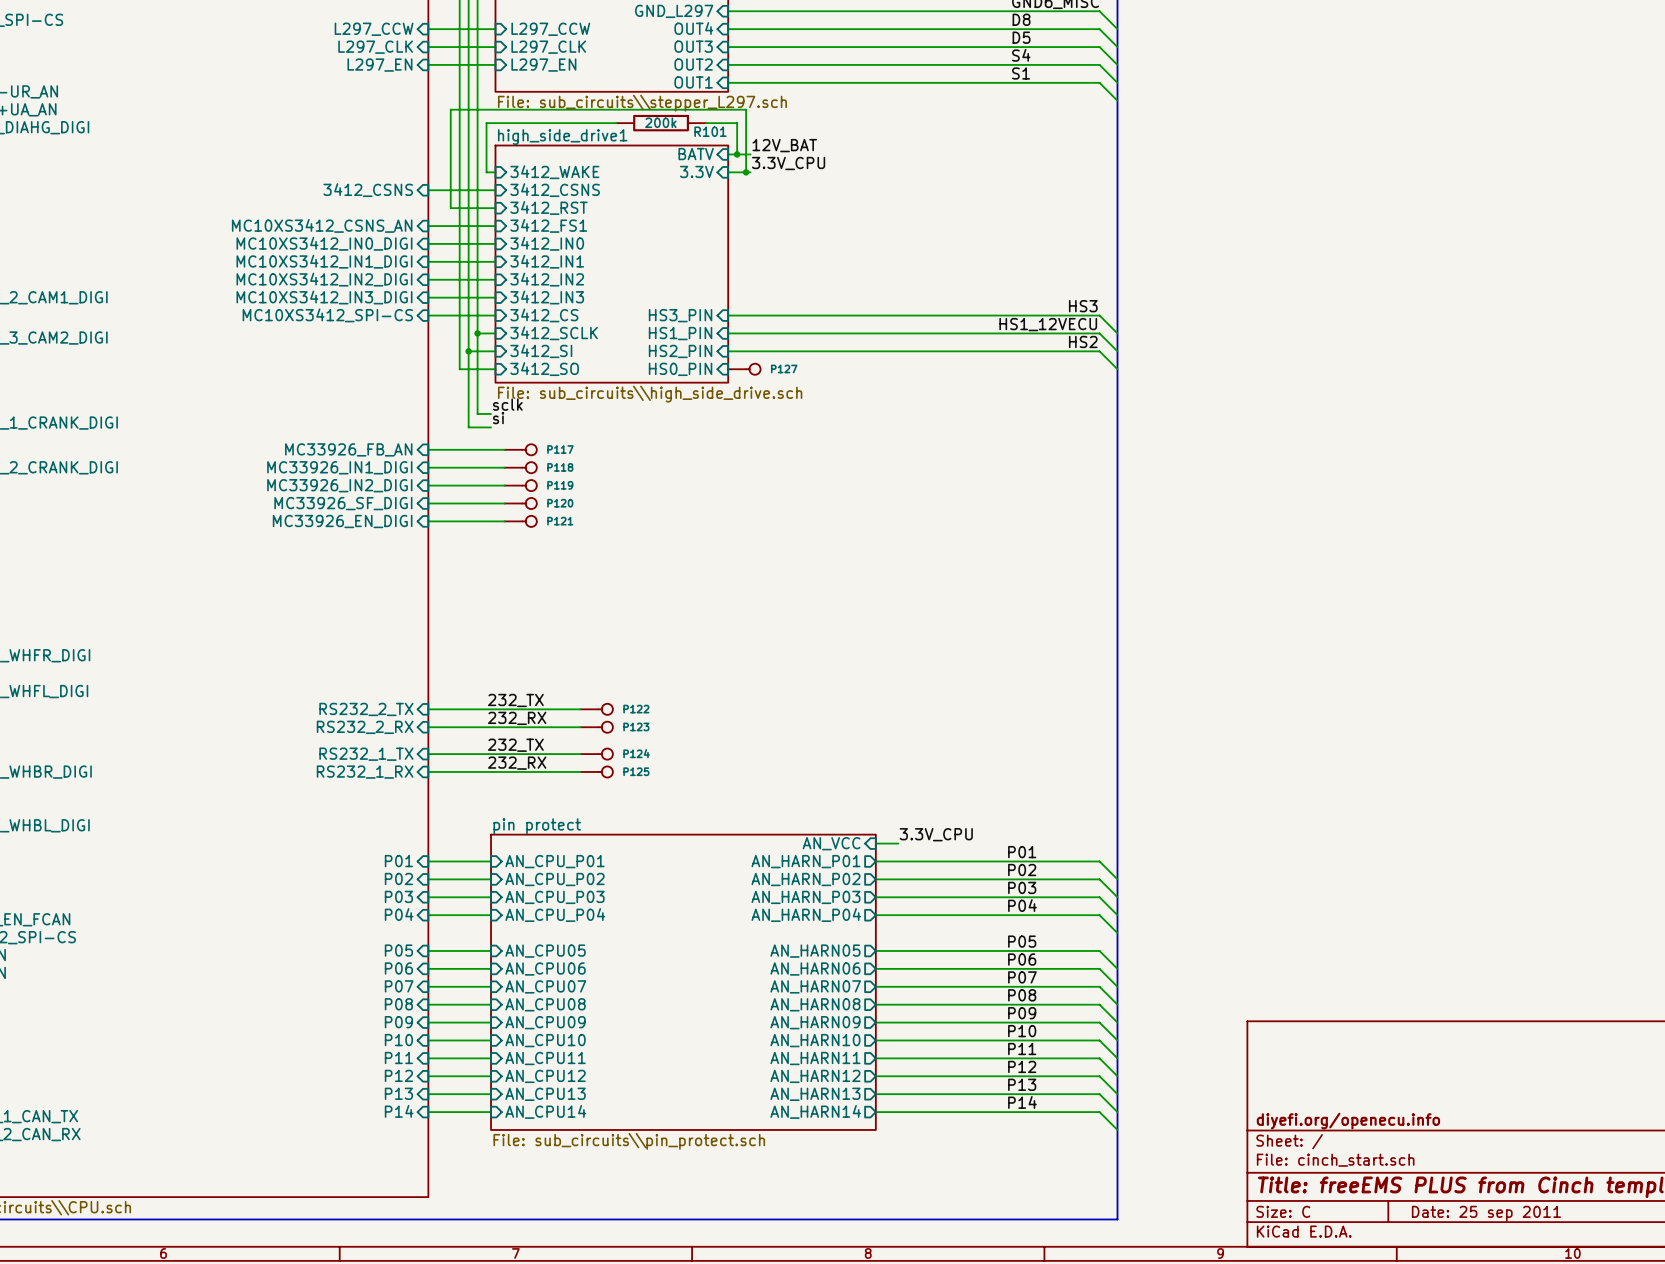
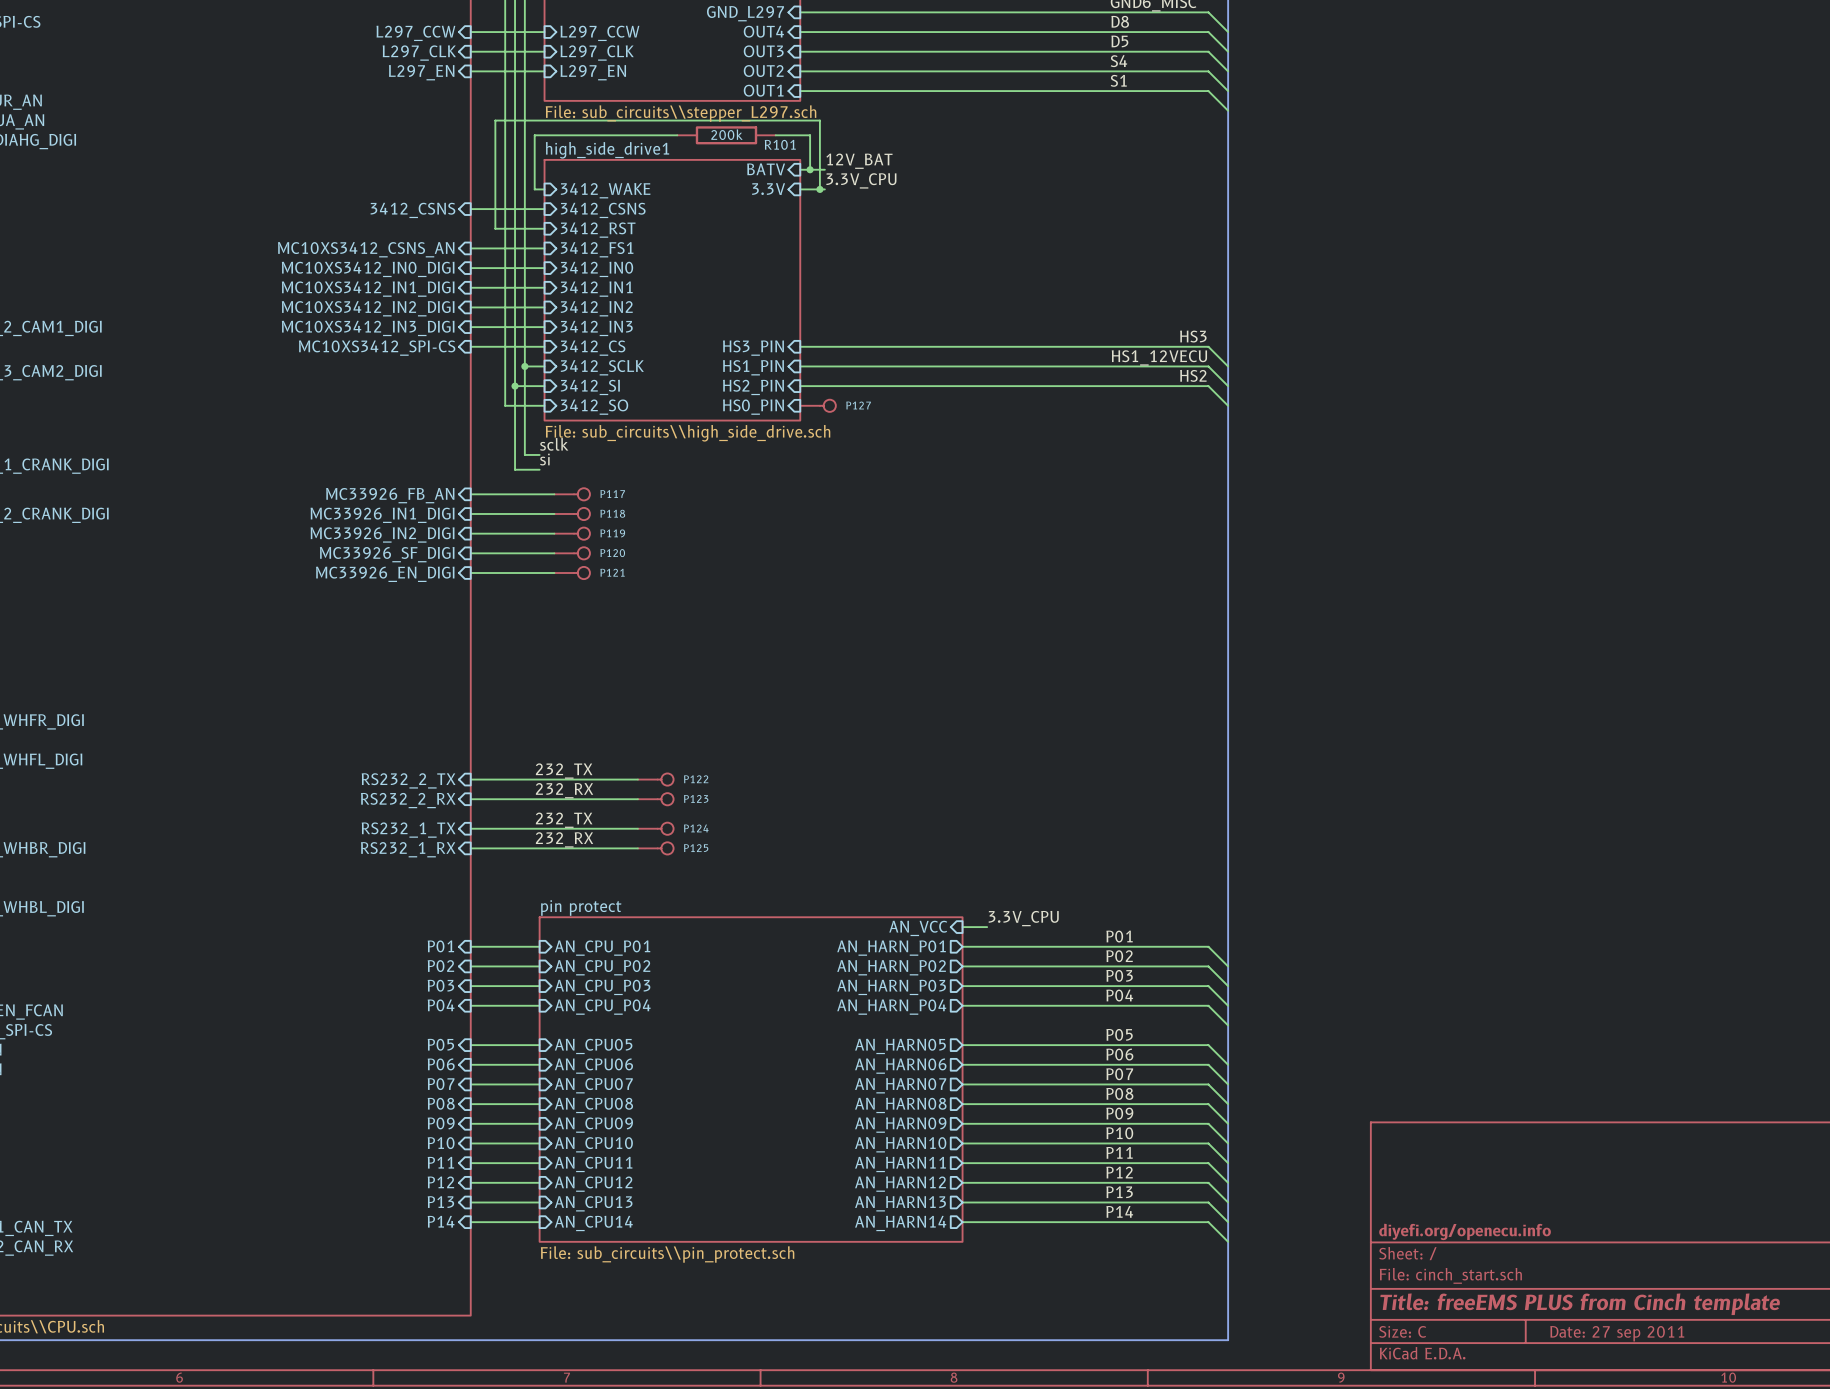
title block: Date: 25 sep 2011 (1486, 1213) -> Date: 27 sep 2011 (1617, 1333)

